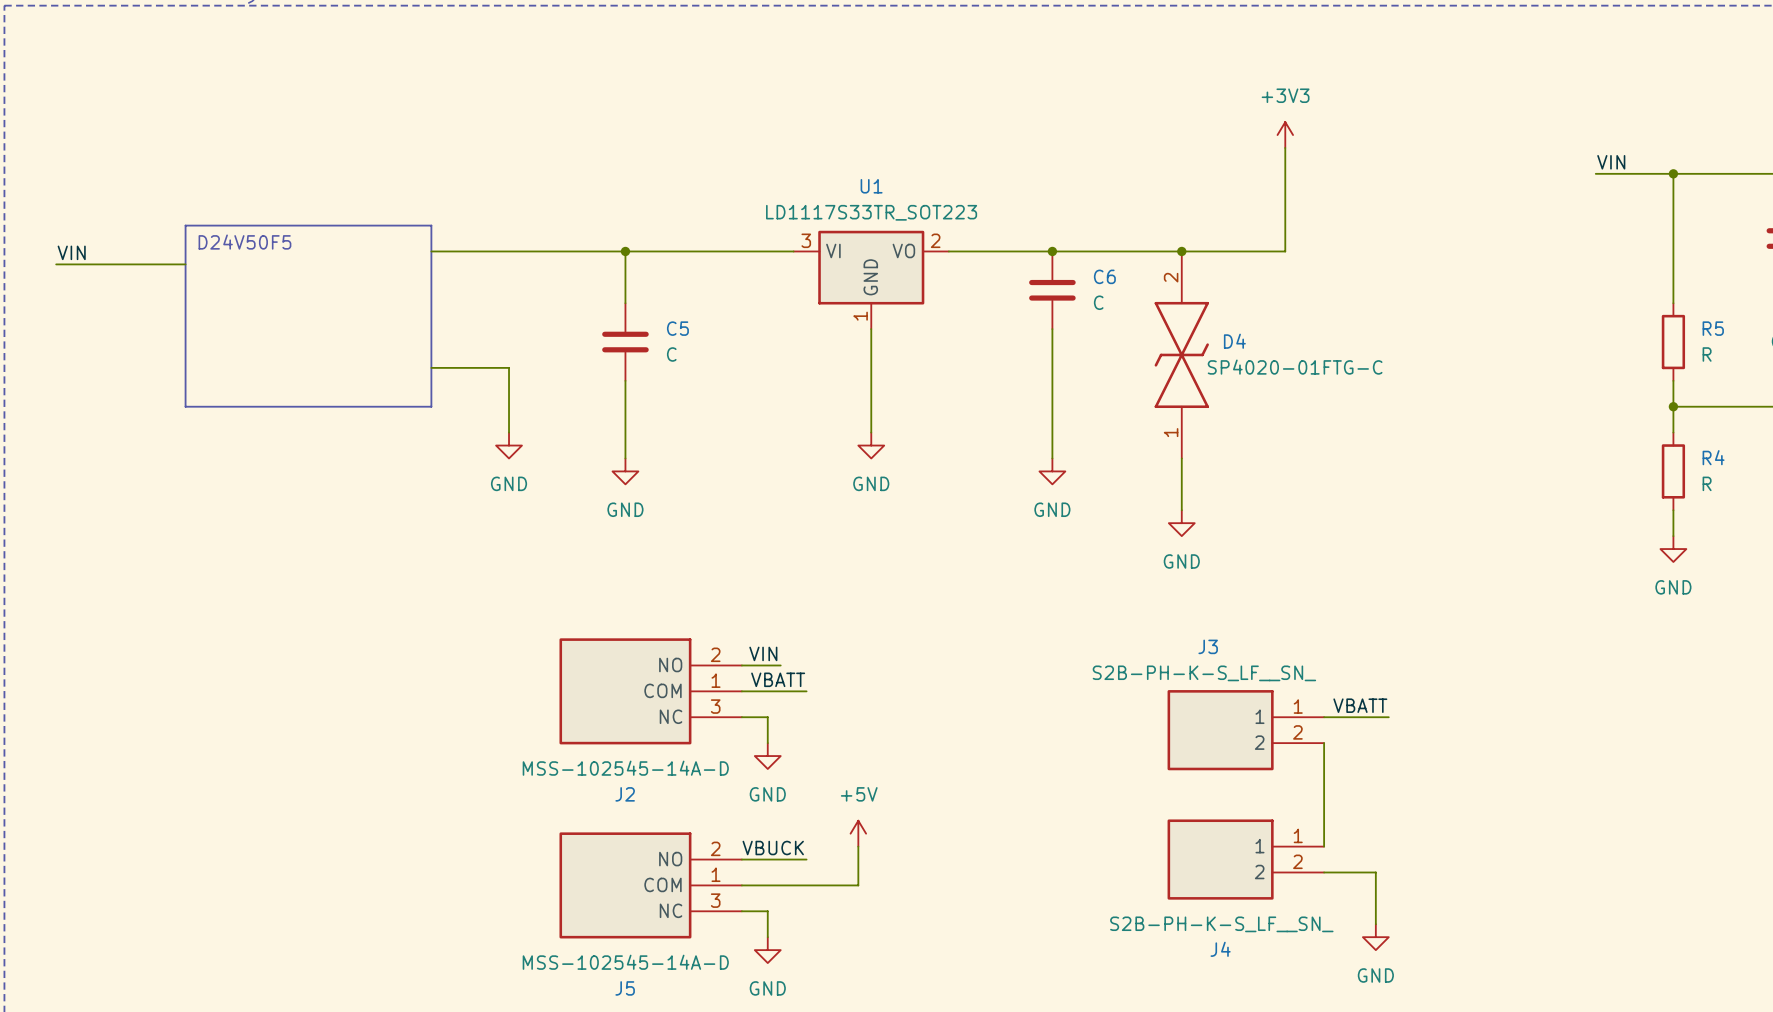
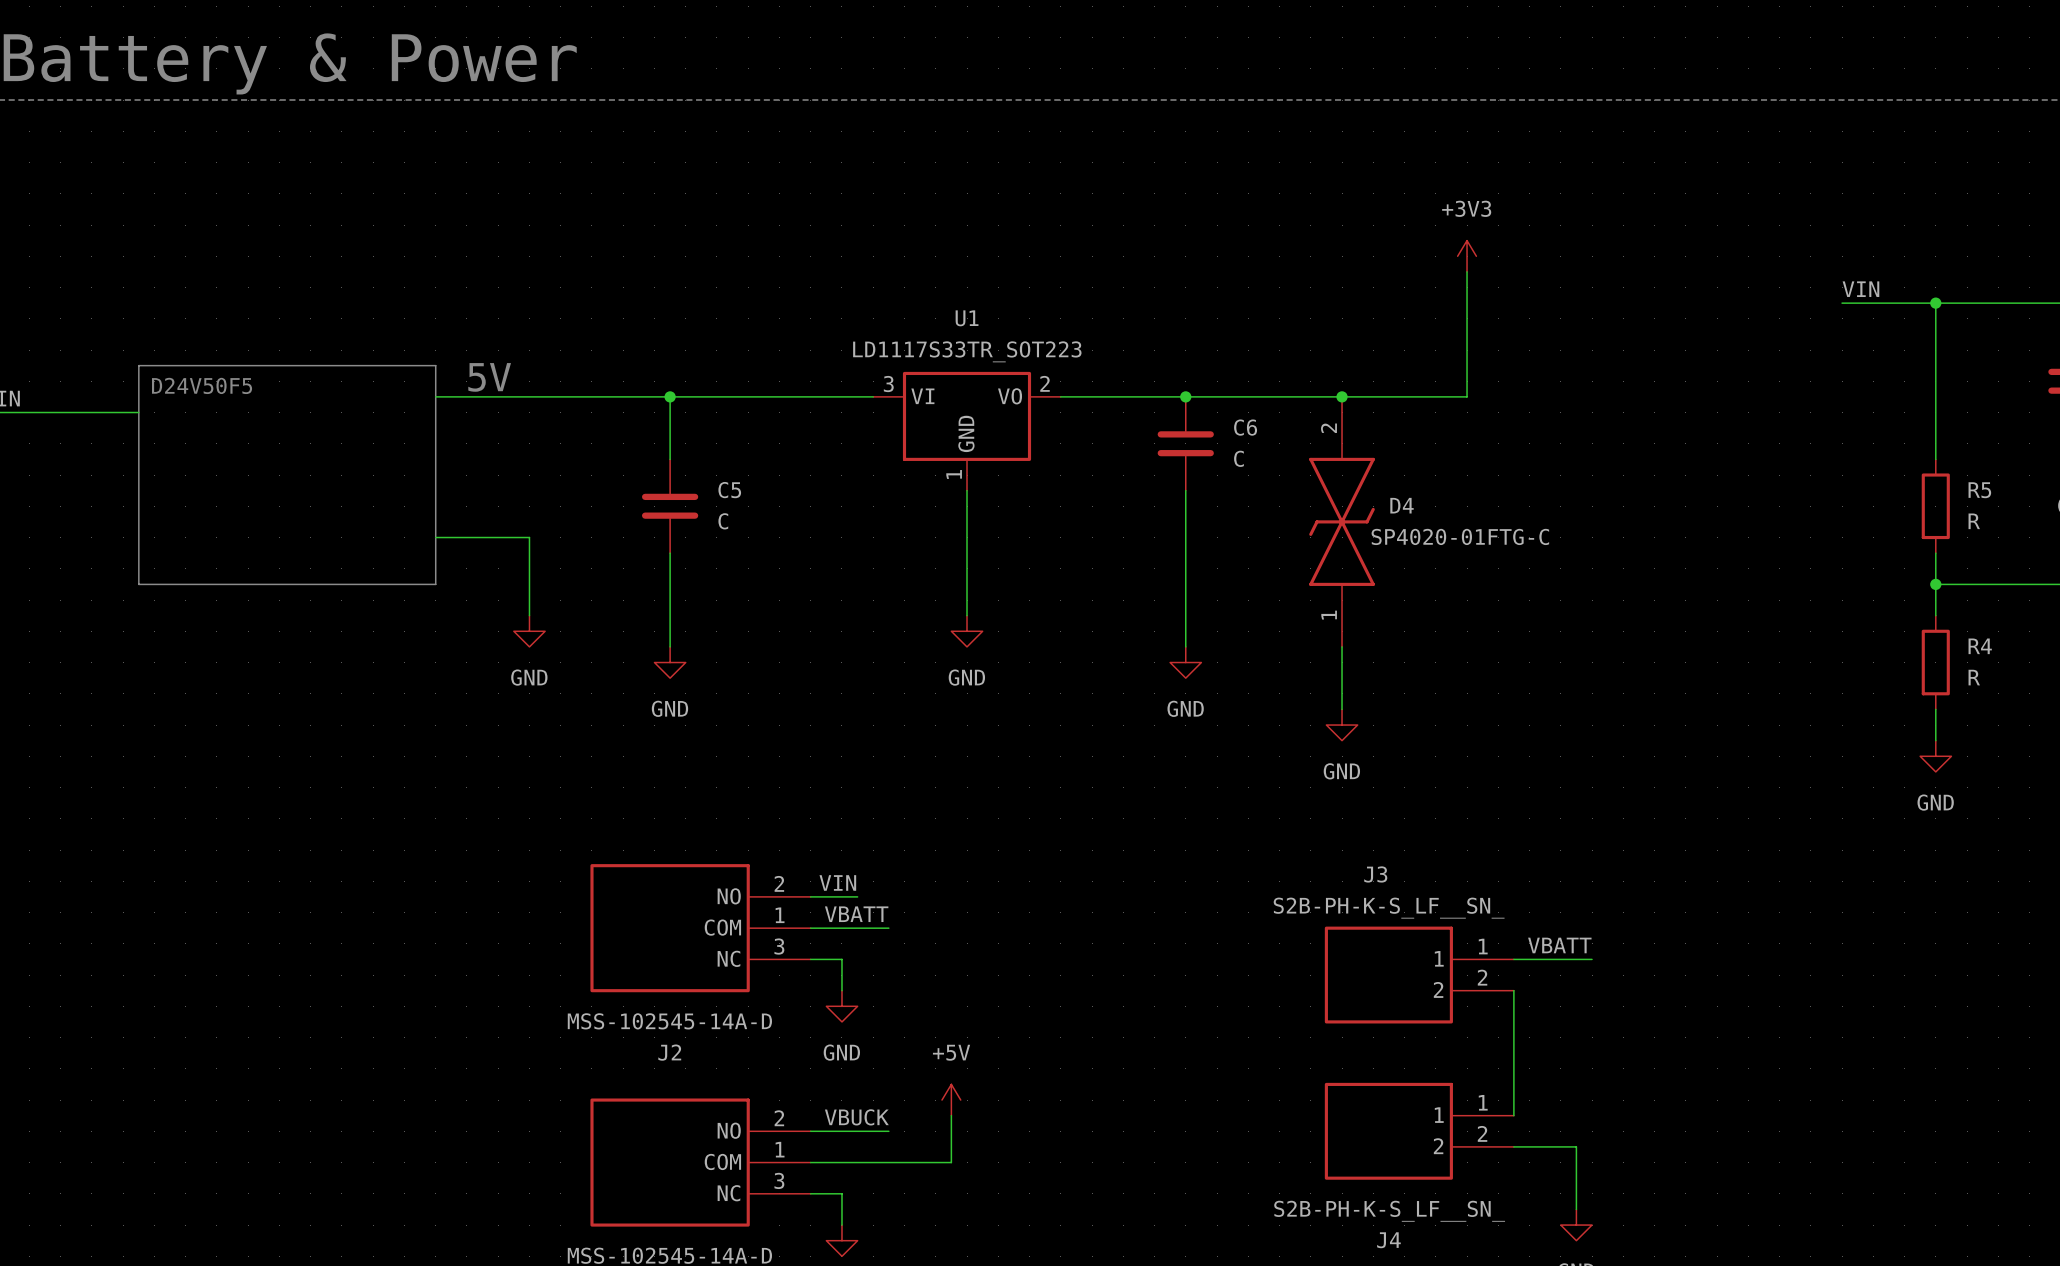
text: none -> 5V (489, 377)

